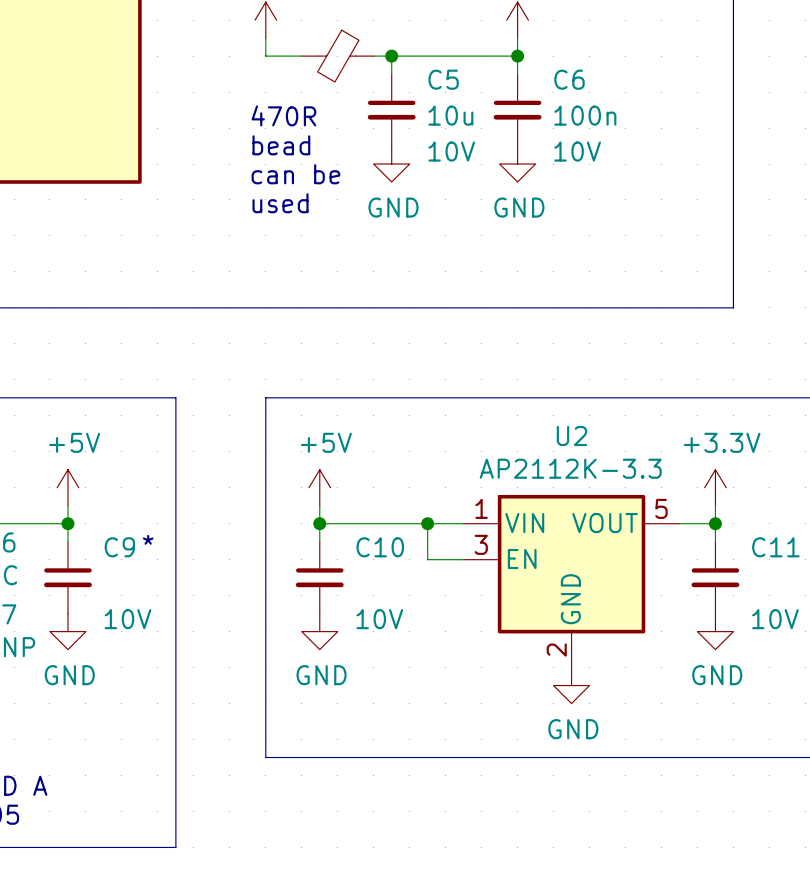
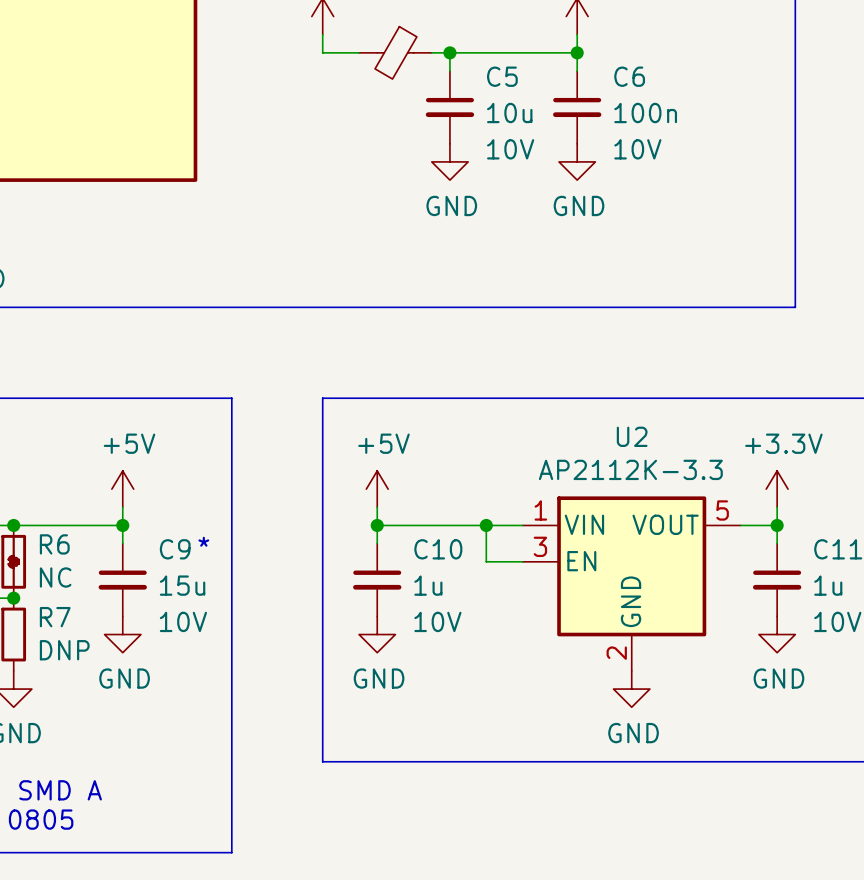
text: 470R (283, 115) -> none
text: bead (281, 145) -> none
text: can be (295, 174) -> none
text: used (280, 203) -> none
C9 value: none -> 15u (182, 585)
C10 value: none -> 1u (428, 585)
C11 value: none -> 1u (828, 585)

